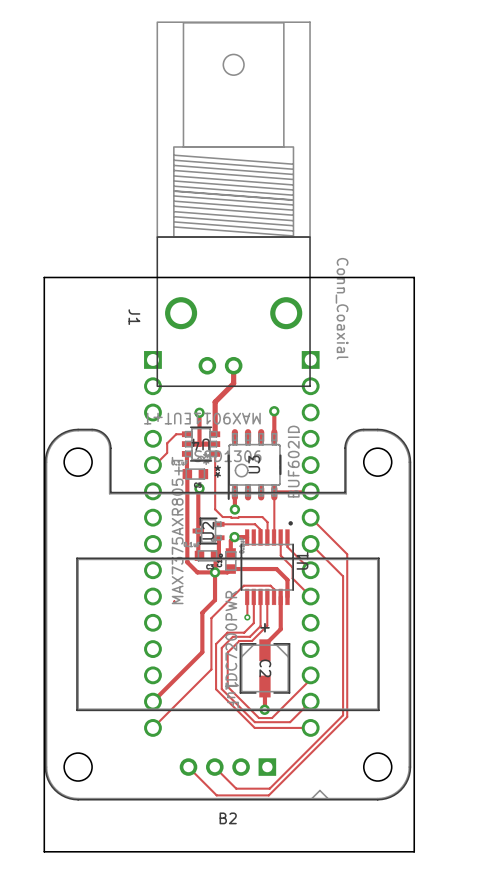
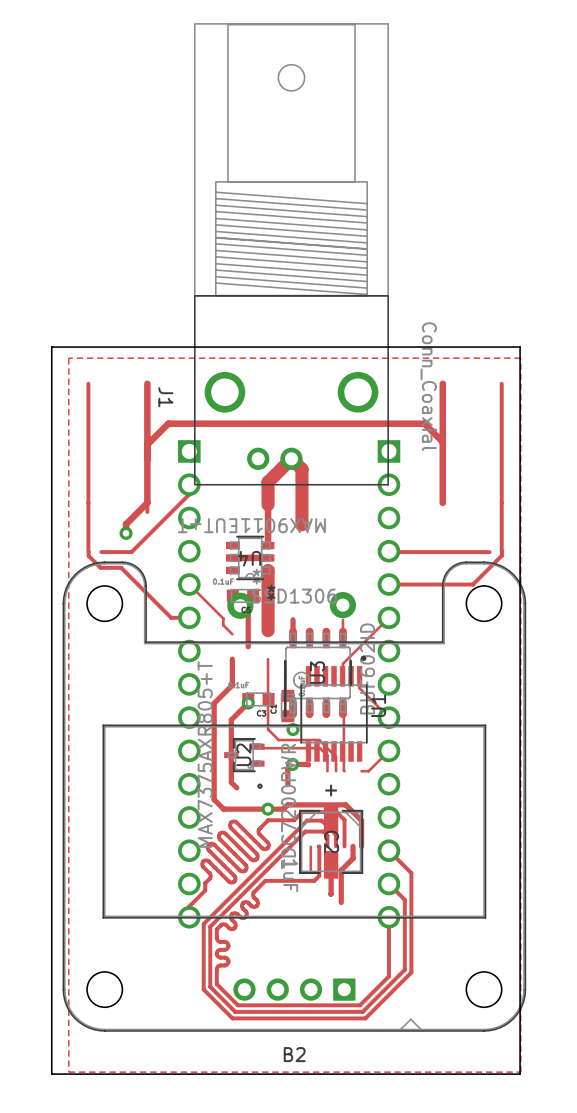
zone outline: none -> (68, 358) (68, 1072) (520, 1072) (520, 358) (68, 358)
track: none -> (88, 383) (88, 555) (100, 567) (121, 567) (171, 617) (189, 617)
track: none -> (147, 383) (147, 502)
track: none -> (442, 383) (442, 502)
track: none -> (501, 383) (502, 555) (472, 584) (388, 584)
track: none -> (442, 442) (424, 423) (168, 423) (147, 444)
track: (233, 365) (233, 383) (215, 402) -> (301, 524) (301, 469) (291, 458) (268, 482) (268, 504)
track: none -> (189, 484) (189, 494) (131, 552) (101, 552)
track: none -> (147, 502) (147, 512)
track: none -> (147, 502) (126, 524) (126, 533)
track: (274, 411) (274, 436) -> none
via: (274, 411) -> none
track: (199, 412) (199, 444) -> none
via: (199, 412) -> none
via: none -> (126, 533)
track: (186, 434) (176, 434) (167, 443) (167, 452) (155, 465) -> none
track: none -> (388, 551) (489, 552)
track: (186, 453) (187, 562) (197, 572) (227, 572) (230, 569) (276, 569) (287, 579) (287, 596) -> none
track width: thin (215, 453) (215, 501) -> thick (268, 570) (268, 630)
U3 position: (254, 464) -> (318, 672)
track: none -> (189, 584) (223, 618) (223, 625) (232, 634)
track: none -> (240, 605) (248, 613) (248, 646)
via: none -> (342, 605)
via size: [194, 483, 205, 494] -> [227, 592, 254, 619]
track: (201, 490) (198, 489) (199, 555) -> none
track: (310, 491) (275, 491) (274, 492) -> (388, 617) (342, 663)
track: (215, 501) (215, 509) (222, 517) (262, 517) (267, 522) (267, 537) -> none
track: (274, 506) (274, 527) -> none
via: (234, 509) -> none
track: (310, 517) (347, 554) (347, 716) (268, 795) (216, 795) (188, 767) -> none
track: none -> (232, 659) (232, 684) (214, 703) (214, 799) (223, 809) (283, 809) (287, 804) (345, 804) (361, 820) (361, 846)
track: none -> (268, 659) (268, 729) (278, 740) (319, 740) (336, 756) (336, 771)
track: (218, 524) (255, 524) (260, 529) (260, 537) -> none
U2 position: (208, 537) -> (244, 763)
track: (218, 537) (218, 552) (215, 555) (215, 600) (202, 612) (202, 652) (152, 701) -> none
via: (234, 537) -> none
track: (247, 537) (234, 537) (230, 540) (230, 553) -> (308, 765) (292, 764) (287, 769) (287, 784)
track: (280, 537) (280, 555) (292, 567) (292, 578) (310, 596) -> (361, 771) (368, 771) (388, 750)
track: (310, 543) (343, 576) (343, 715) (269, 788) (236, 788) (214, 767) -> none
via: none -> (248, 703)
track: none -> (250, 705) (248, 703) (231, 719) (231, 782) (236, 787)
track: none -> (345, 706) (342, 708) (344, 771)
via: (215, 572) -> none
via: none -> (293, 729)
track: none -> (257, 746) (258, 748) (319, 748) (327, 755) (327, 771)
track: (247, 596) (247, 617) -> none
track: (253, 596) (253, 623) (244, 632) (227, 632) (216, 644) (216, 689) (254, 727) (310, 727) -> (318, 846) (319, 875) (314, 880) (265, 880) (253, 893) (257, 901) (256, 905) (252, 906) (244, 902) (241, 906) (246, 912) (245, 916) (241, 917) (235, 913) (231, 914) (231, 918) (235, 924) (234, 928) (230, 929) (223, 924) (216, 929) (217, 940) (226, 942) (228, 945) (226, 949) (219, 950) (216, 952) (218, 956) (226, 957) (228, 961) (226, 964) (217, 967) (216, 984) (237, 1005) (360, 1005) (388, 976) (388, 917)
track: (260, 596) (260, 626) (249, 636) (232, 636) (221, 647) (221, 689) (254, 722) (290, 722) (310, 701) -> (327, 846) (327, 835) (323, 831) (305, 831) (210, 926) (210, 986) (235, 1011) (362, 1011) (404, 969) (404, 899) (388, 884)
track: (267, 596) (267, 625) (252, 640) (239, 640) (227, 652) (227, 686) (259, 718) (272, 718) (310, 679) -> none
track: (274, 596) (274, 589) (270, 585) (243, 585) (211, 618) (211, 669) (152, 727) -> (344, 846) (344, 819) (336, 812) (302, 812) (294, 820) (268, 820) (258, 831) (268, 844) (265, 849) (236, 822) (232, 821) (230, 827) (256, 853) (257, 858) (251, 859) (225, 833) (220, 833) (219, 838) (245, 865) (246, 868) (240, 870) (214, 844) (209, 844) (208, 850) (234, 875) (235, 879) (233, 882) (229, 881) (208, 861) (203, 861) (202, 866) (210, 877) (205, 883) (205, 890) (189, 906) (189, 917)
track: (280, 596) (280, 629) (264, 644) (264, 650) -> none
via: none -> (292, 764)
B2 position: (227, 614) -> (294, 796)
via: (247, 617) -> none
via: none -> (267, 809)
track: none -> (336, 846) (336, 834) (321, 820) (307, 820) (203, 924) (203, 989) (232, 1018) (365, 1018) (411, 972) (411, 873) (388, 850)
track: none -> (353, 846) (353, 858) (341, 870) (341, 902)
track: none -> (310, 846) (310, 872)
via: (264, 709) -> none

